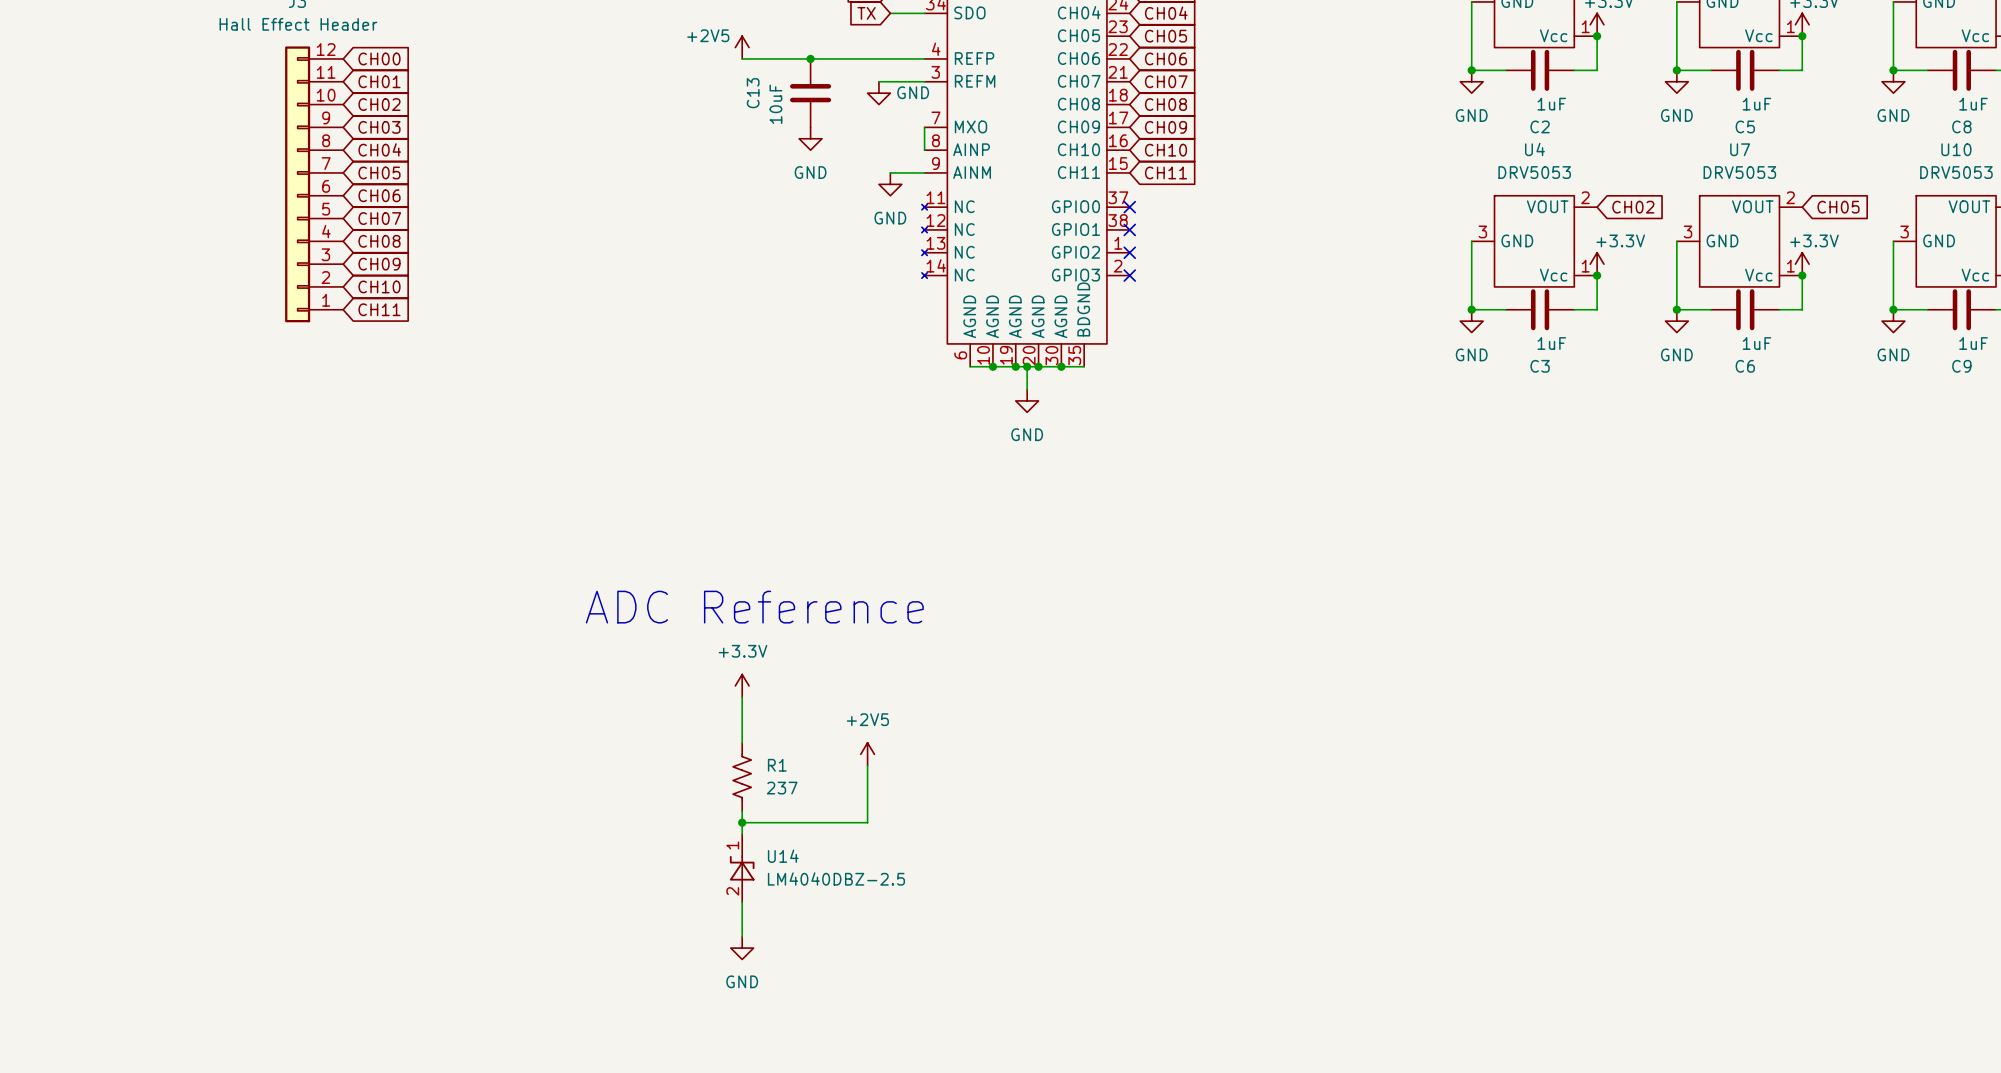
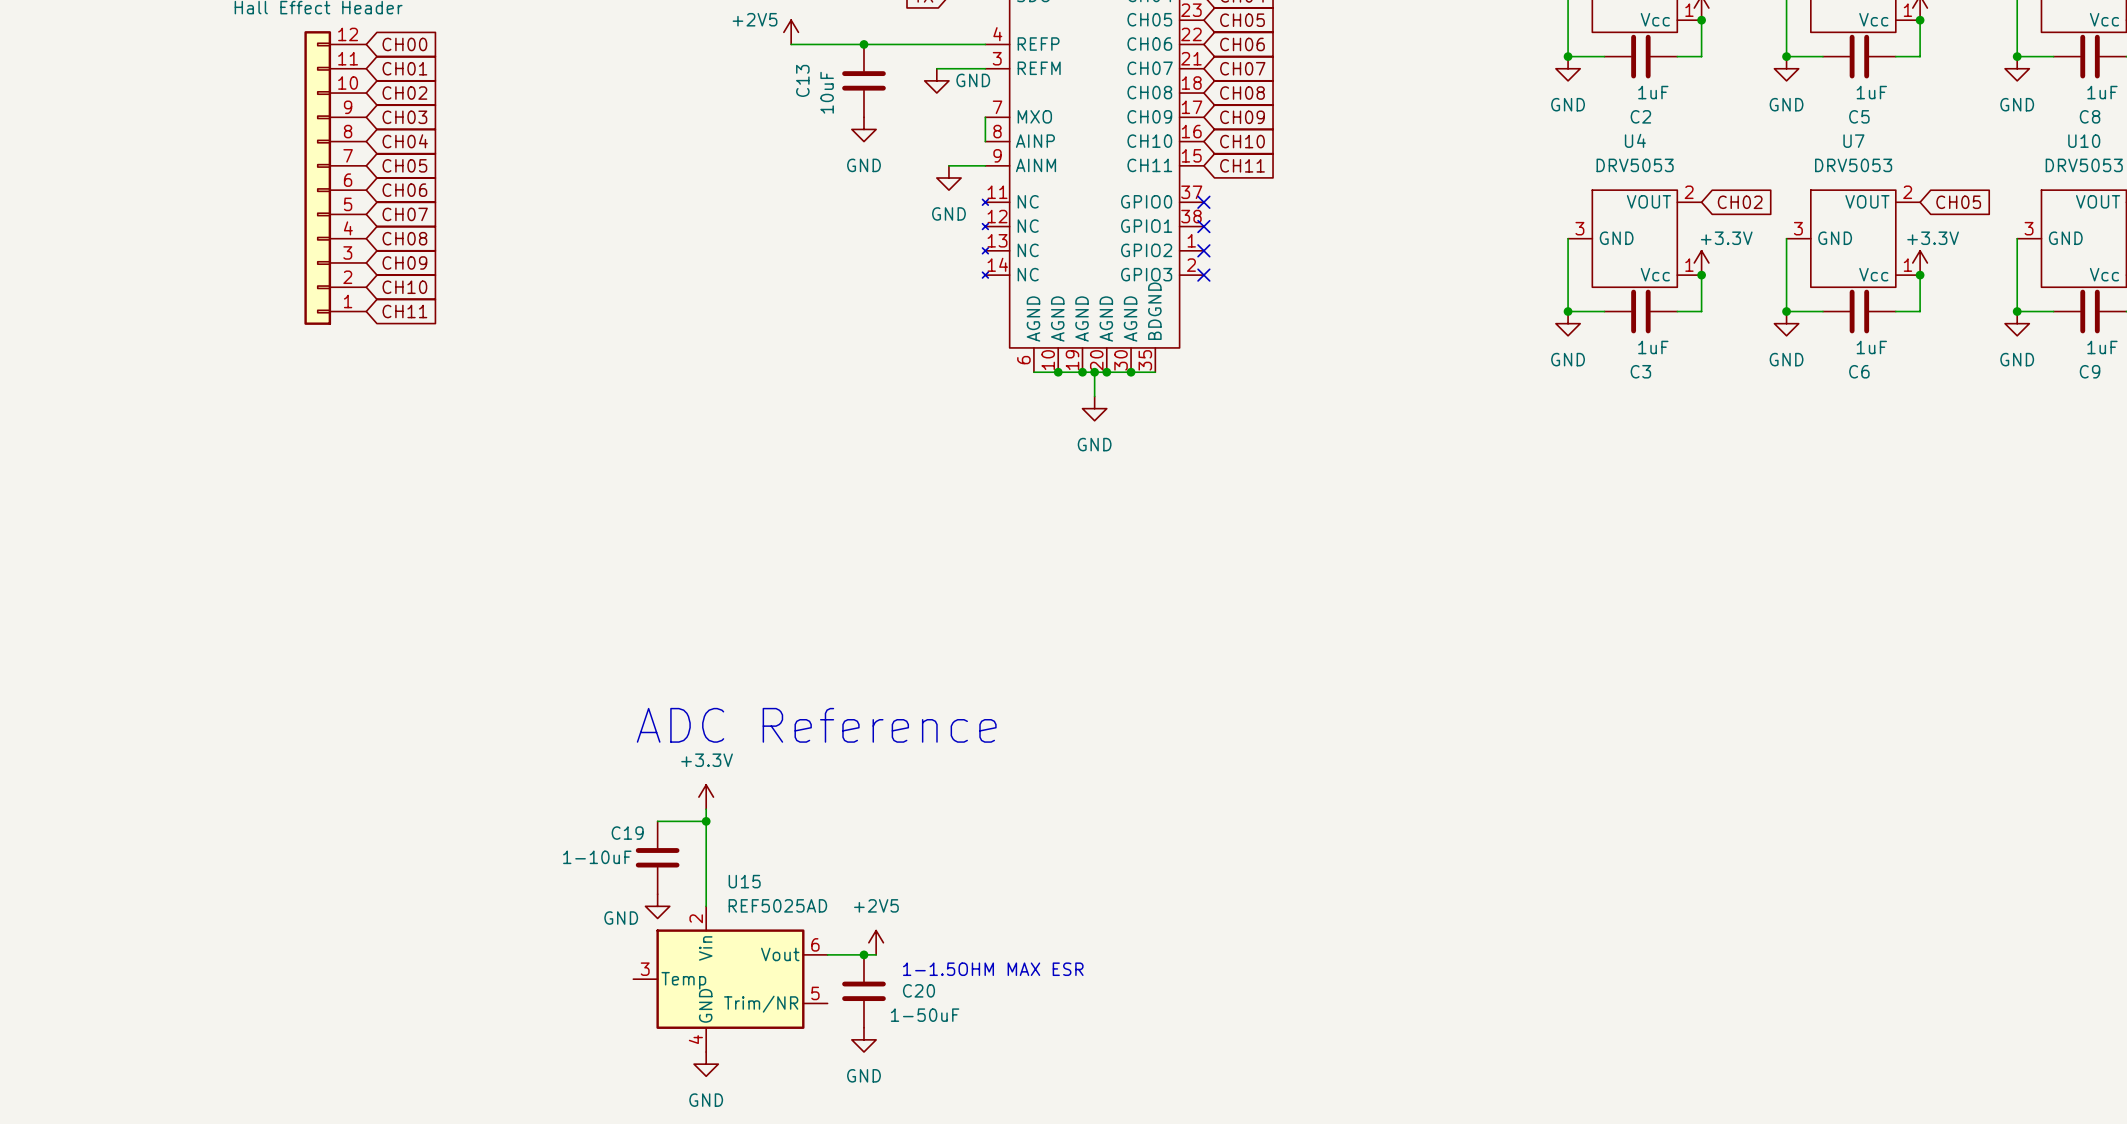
text position: ADC Reference (754, 607) -> ADC Reference (816, 725)
power symbol position: +3.3V (742, 685) -> +3.3V (706, 797)
wire: (742, 697) (742, 742) -> none
power symbol position: +2V5 (867, 754) -> +2V5 (876, 942)
wire: (867, 765) (867, 822) (742, 822) -> none
wire: none -> (706, 809) (706, 906)
R1: 237 (742, 777) -> none
wire: none -> (657, 821) (706, 821)
junction: none -> (706, 821)
wire: (742, 811) (742, 834) -> none
C19: none -> 1-10uF (657, 857)
junction: (742, 822) -> none
power symbol: none -> GND (657, 906)
U14: LM4040DBZ-2.5 (742, 868) -> none
wire: none -> (827, 954) (876, 954)
junction: none -> (863, 954)
text: none -> 1-1.5OHM MAX ESR (993, 969)
U15: none -> REF5025AD (730, 979)
power symbol: GND (742, 948) -> none
C20: none -> 1-50uF (863, 991)
power symbol: none -> GND (863, 1039)
power symbol: none -> GND (706, 1064)

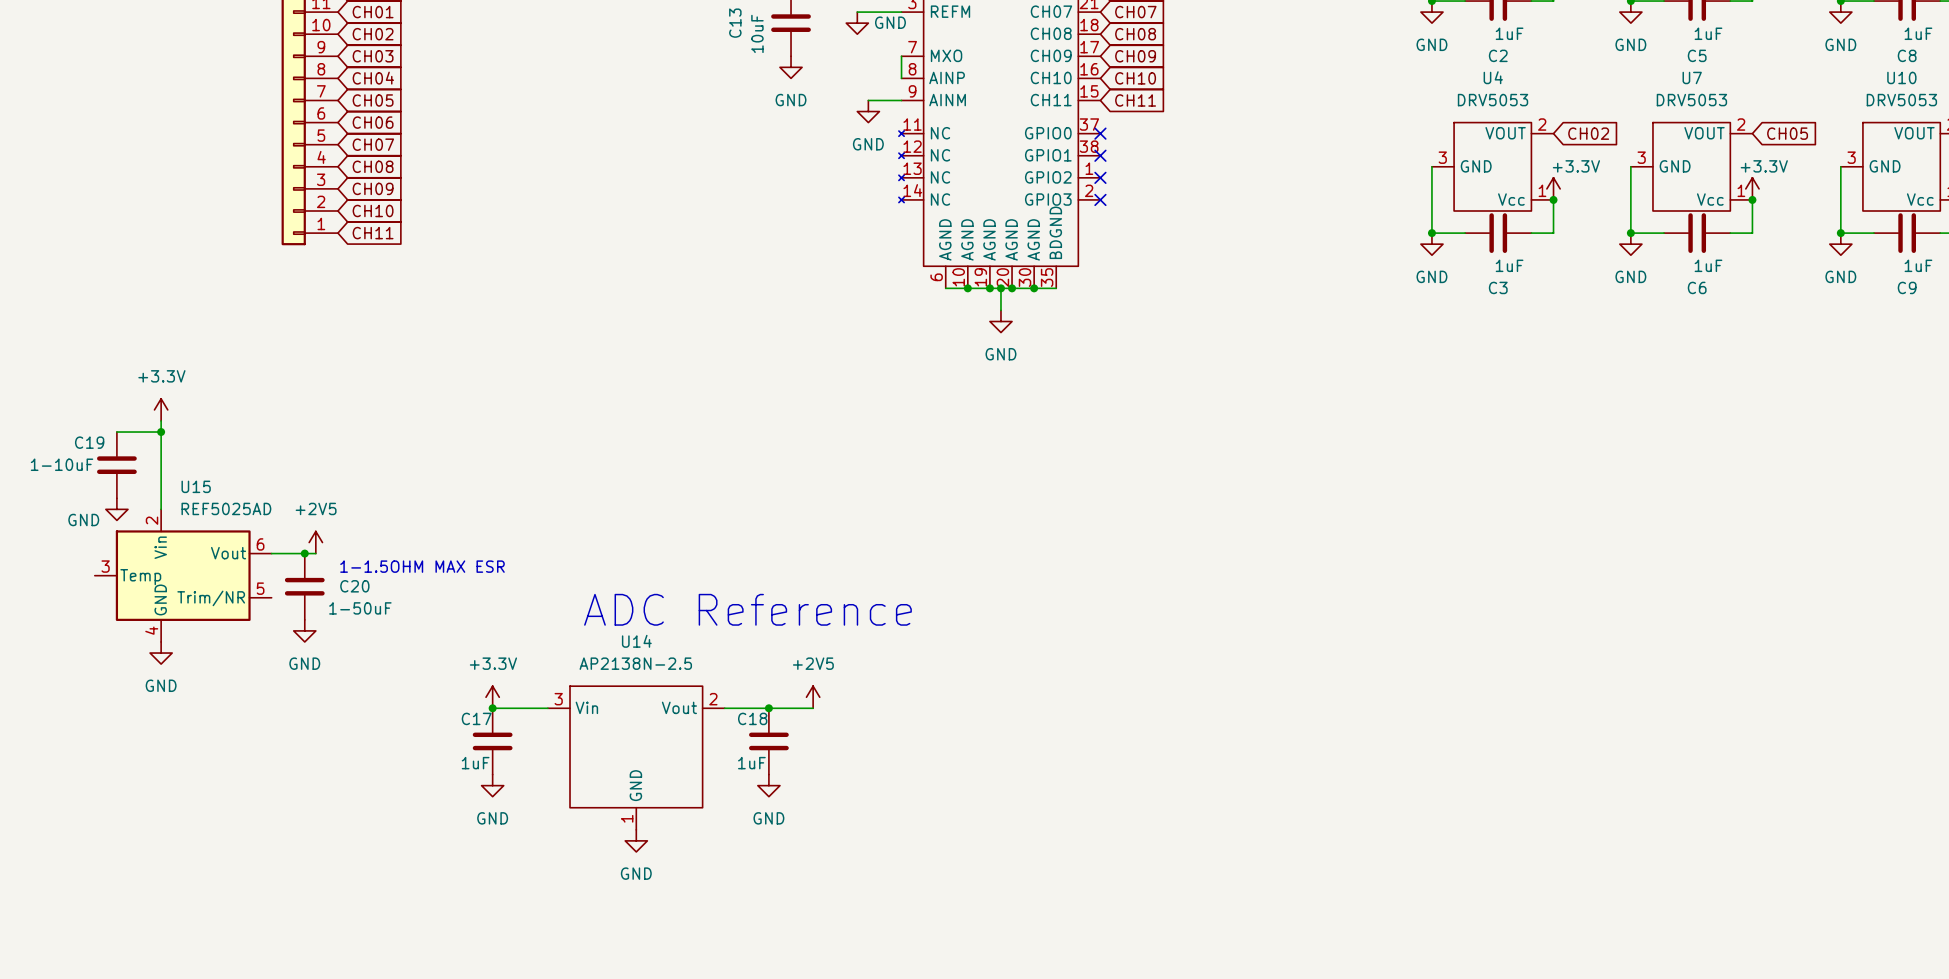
power symbol: none -> +3.3V (161, 409)
wire: none -> (161, 420) (161, 509)
wire: none -> (116, 432) (161, 432)
junction: none -> (161, 432)
power symbol: none -> GND (116, 509)
power symbol: none -> +2V5 (315, 542)
wire: none -> (271, 553) (315, 553)
junction: none -> (304, 553)
text: none -> 1-1.5OHM MAX ESR (422, 566)
power symbol: none -> GND (304, 630)
power symbol: none -> GND (161, 653)
power symbol position: +3.3V (706, 797) -> +3.3V (492, 697)
wire: (706, 809) (706, 906) -> none
wire: (657, 821) (706, 821) -> none
junction: (706, 821) -> none
wire: none -> (492, 708) (547, 708)
junction: none -> (492, 708)
wire: none -> (724, 708) (813, 708)
junction: none -> (768, 708)
C19 position: (657, 857) -> (116, 465)
C17: none -> 1uF (492, 741)
C18: none -> 1uF (768, 741)
U14: none -> AP2138N-2.5 (636, 758)
power symbol: GND (657, 906) -> none
power symbol: none -> GND (492, 785)
power symbol: none -> GND (768, 785)
power symbol position: +2V5 (876, 942) -> +2V5 (813, 697)
wire: (827, 954) (876, 954) -> none
junction: (863, 954) -> none
text: 1-1.5OHM MAX ESR (993, 969) -> none
power symbol: none -> GND (636, 840)
U15 position: (730, 979) -> (183, 575)
C20 position: (863, 991) -> (304, 586)
power symbol: GND (863, 1039) -> none
power symbol: GND (706, 1064) -> none

